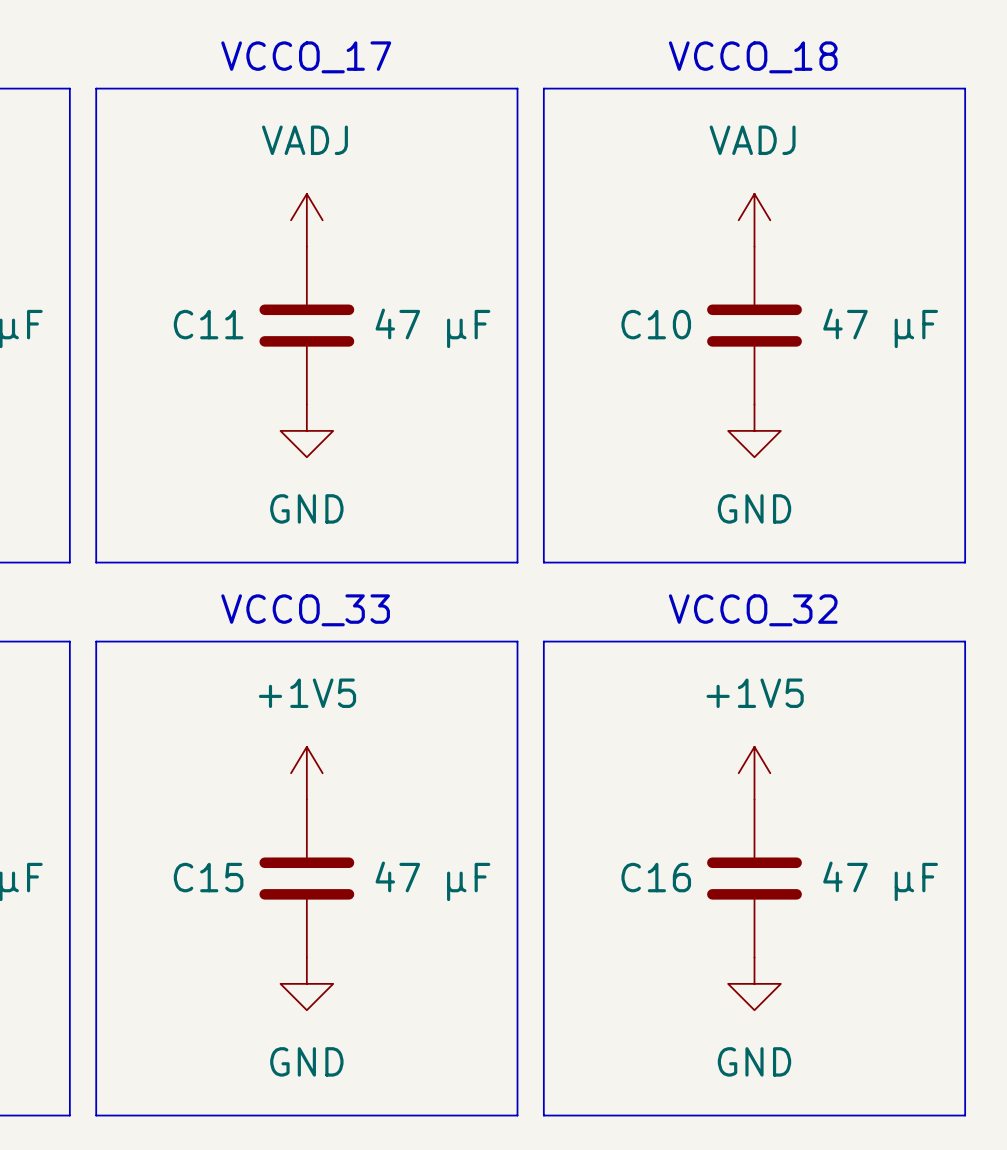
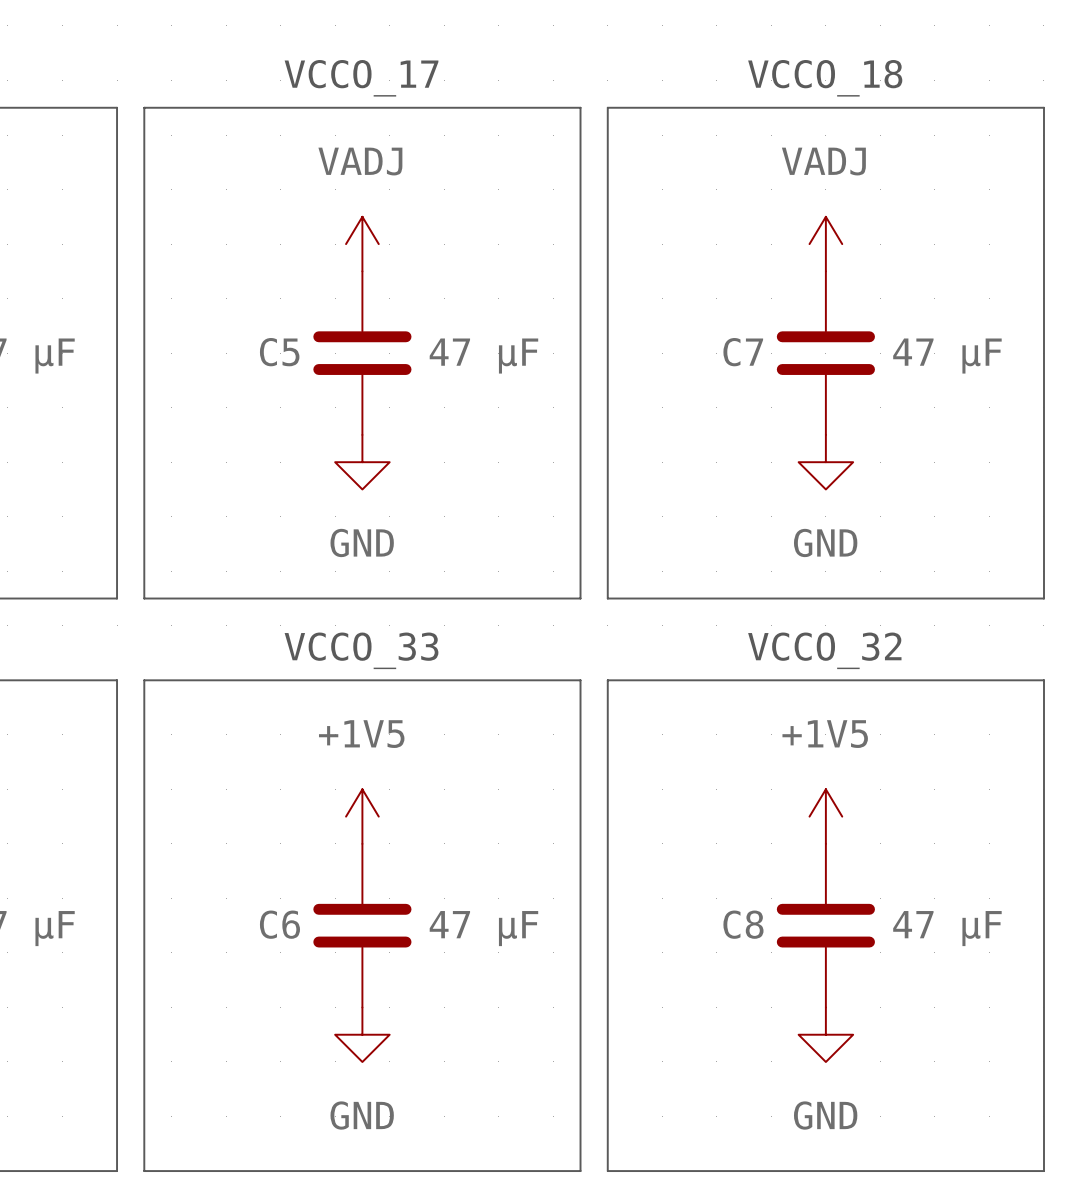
C11 name: C11 (208, 324) -> C5 (279, 352)
C10 name: C10 (656, 324) -> C7 (743, 352)
C15 name: C15 (208, 877) -> C6 (279, 924)
C16 name: C16 (656, 877) -> C8 (743, 924)

